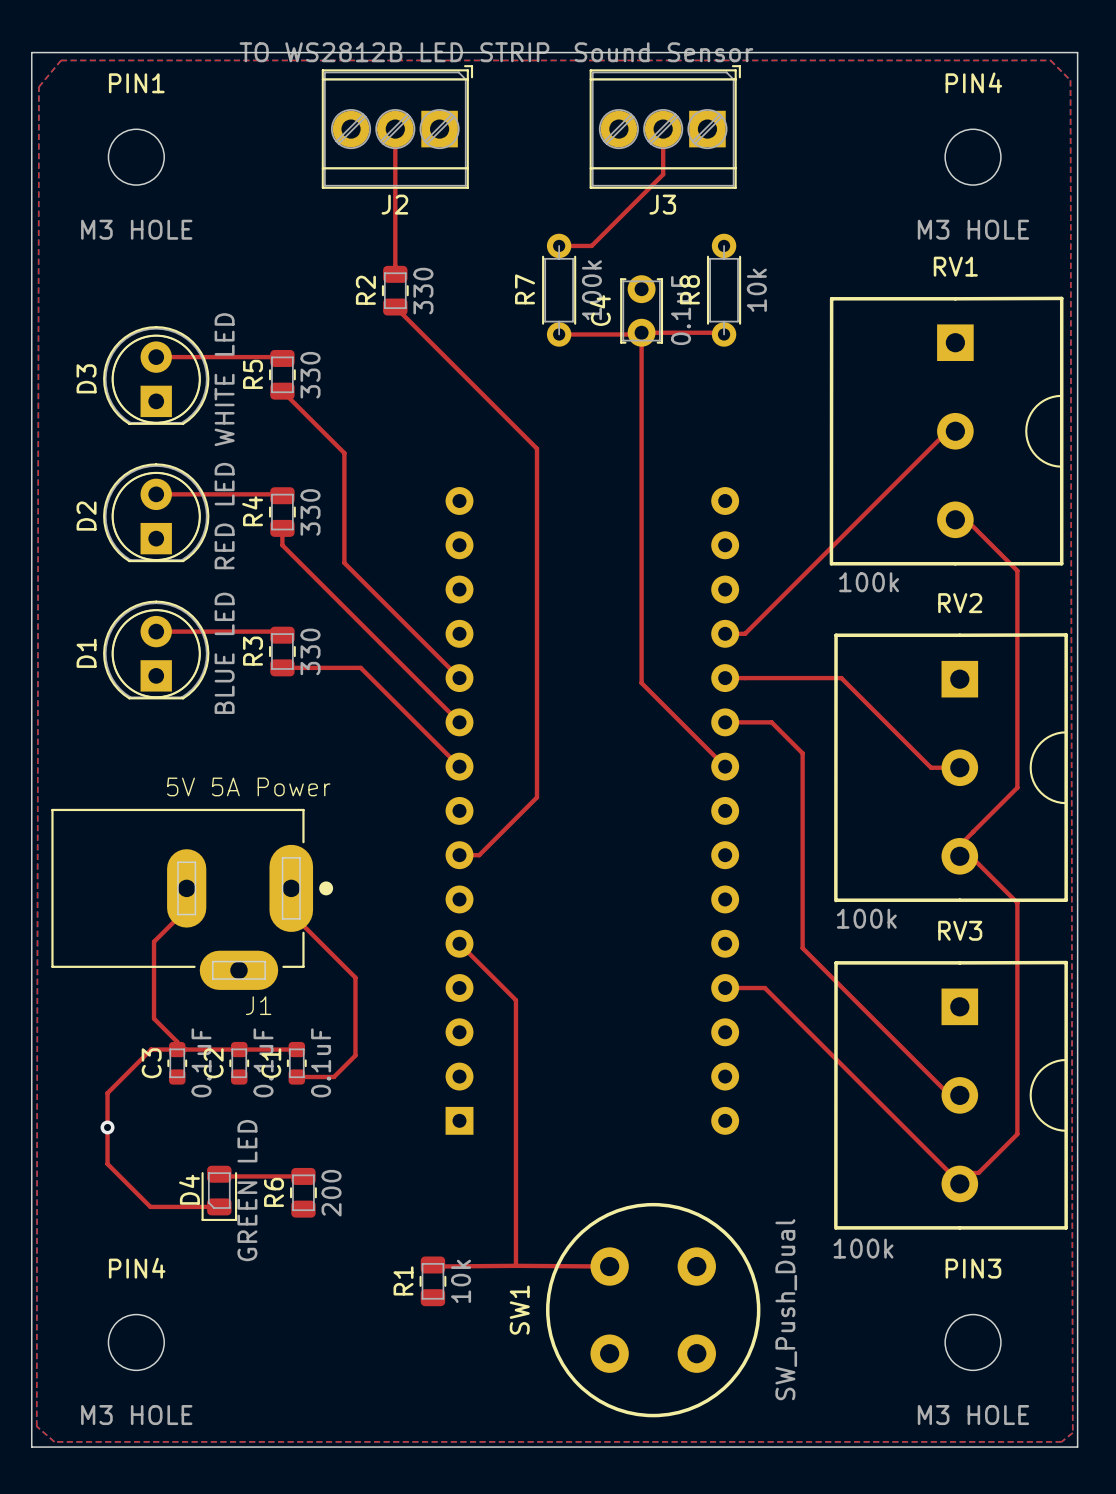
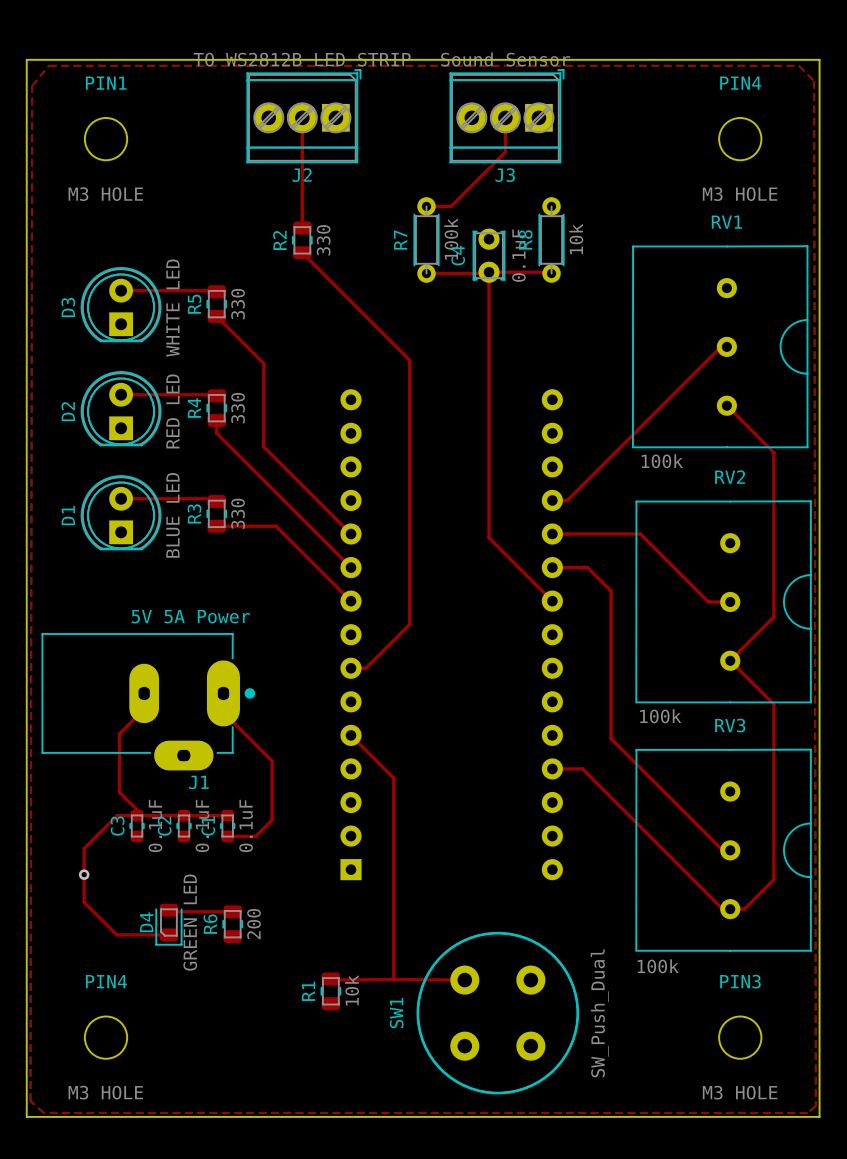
RV1 footprint: [829, 296, 1064, 566] -> [632, 245, 809, 449]
RV2 footprint: [834, 633, 1068, 903] -> [635, 500, 812, 704]
RV3 footprint: [834, 960, 1068, 1230] -> [635, 748, 812, 952]

